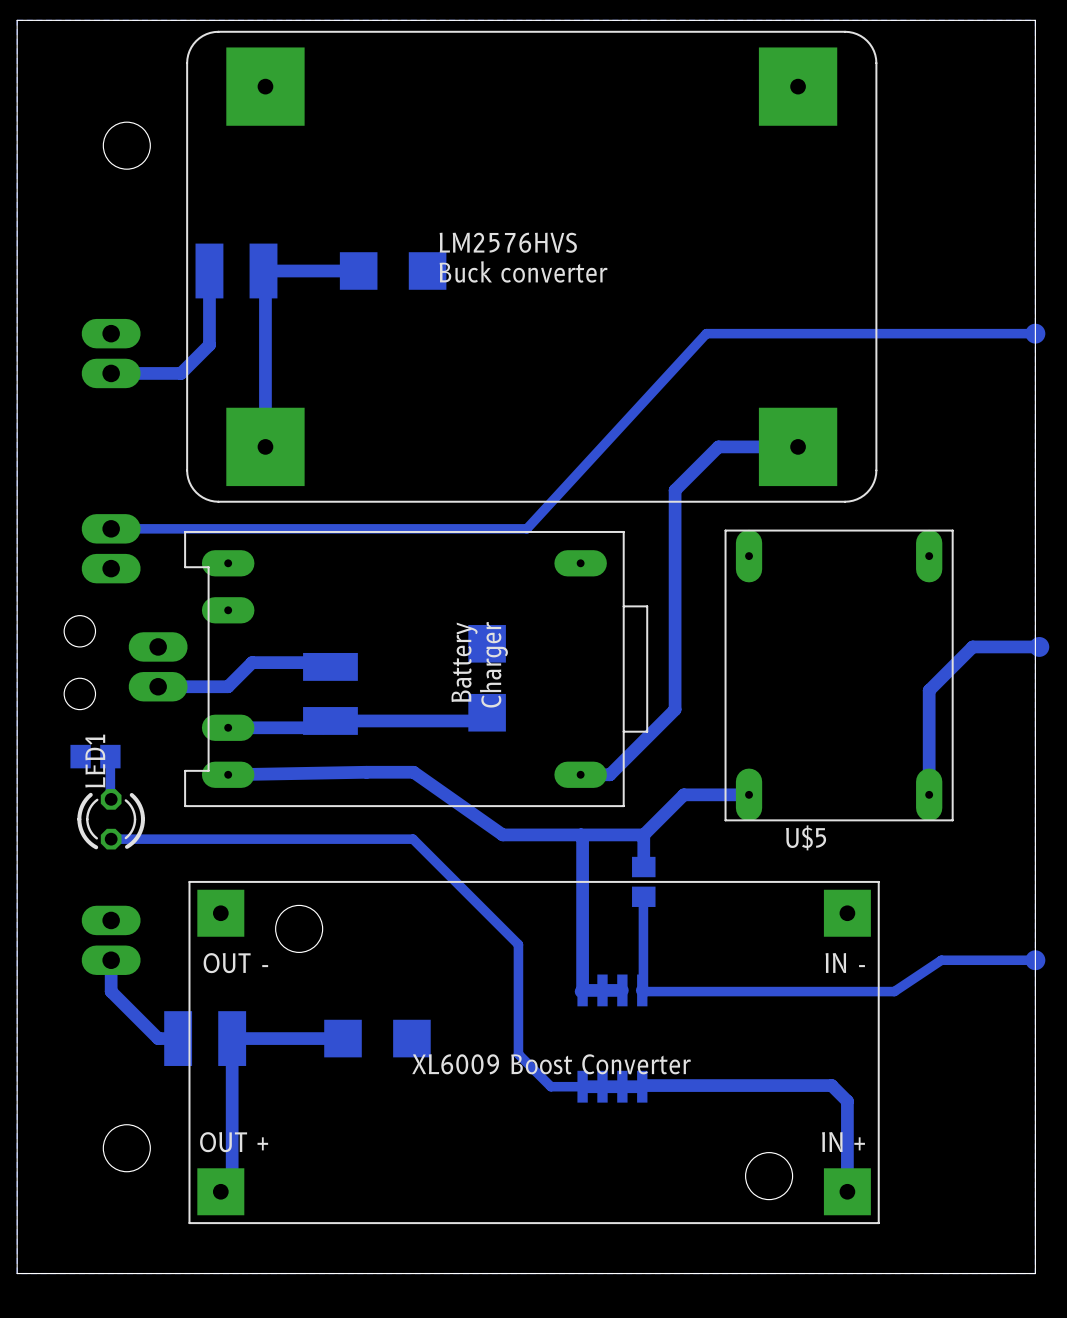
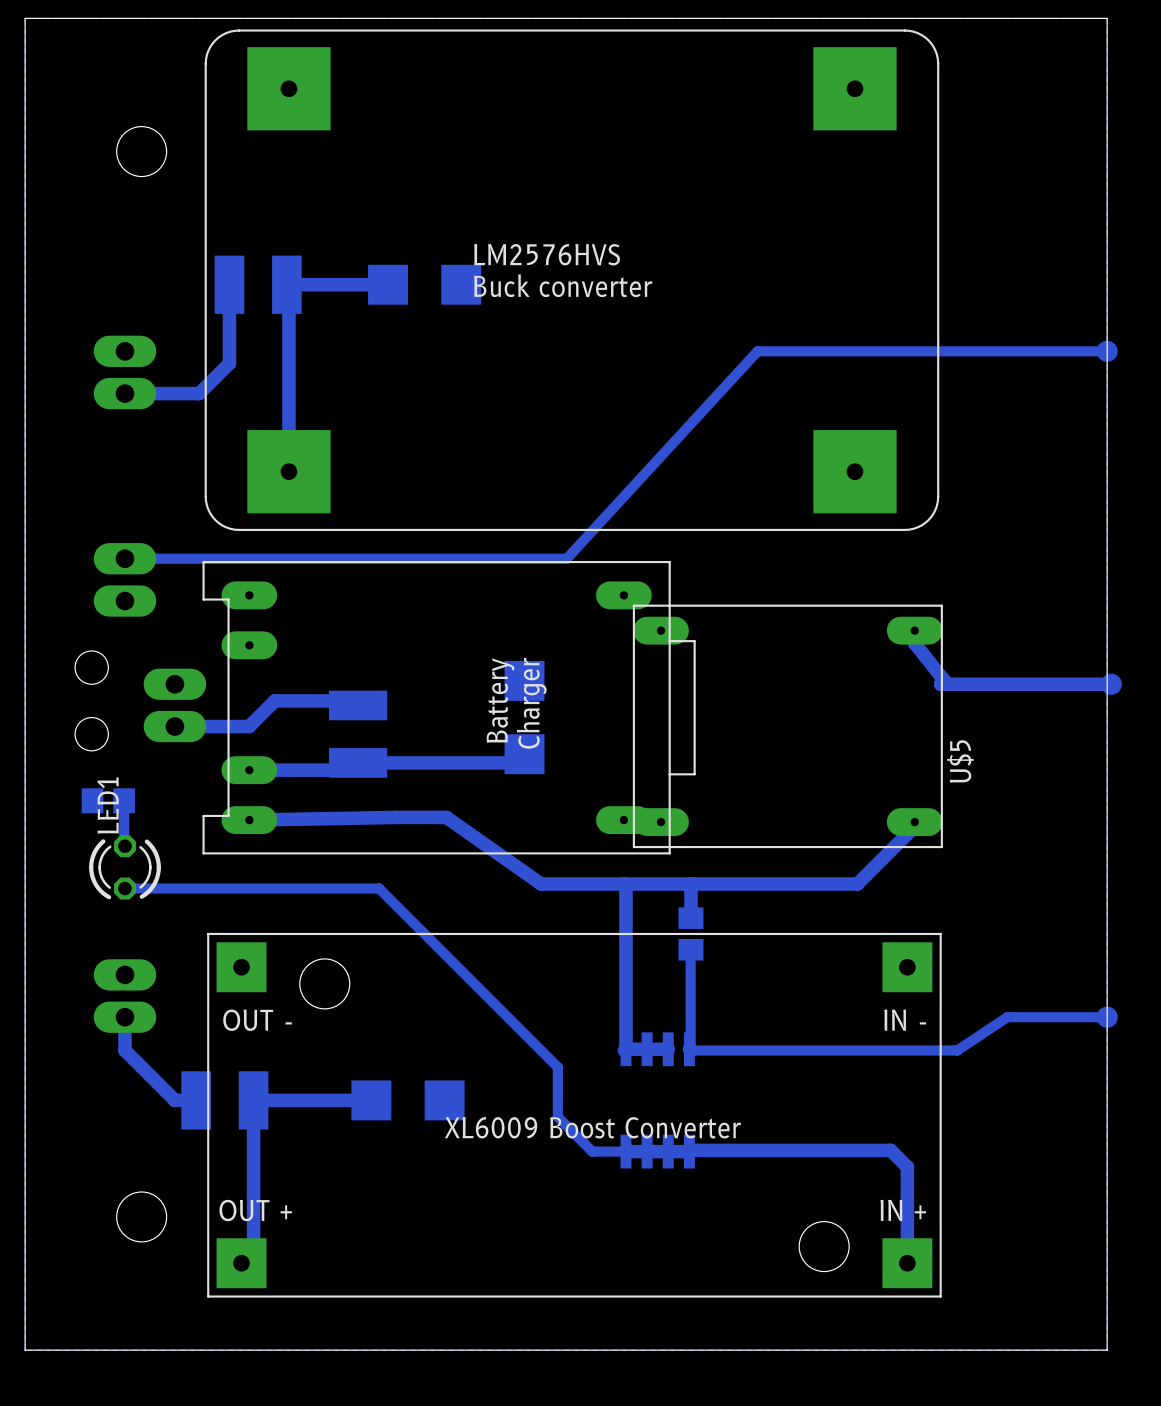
bottom track: (798, 446) (718, 446) (675, 490) (675, 709) (609, 774) (580, 774) -> none
bottom track: (972, 646) (929, 690) (929, 794) -> (1040, 684) (940, 684) (944, 680) (914, 643) (914, 630)
U$5 rotation: 0° (839, 675) -> 90° clockwise (787, 726)
bottom track: (749, 794) (683, 794) (643, 834) -> (914, 822) (914, 826) (857, 884) (690, 884)
U$5 name position: U$5 (806, 837) -> U$5 (960, 761)
bottom track: (350, 839) (413, 839) (518, 944) (518, 1007) -> (379, 888) (557, 1067)

